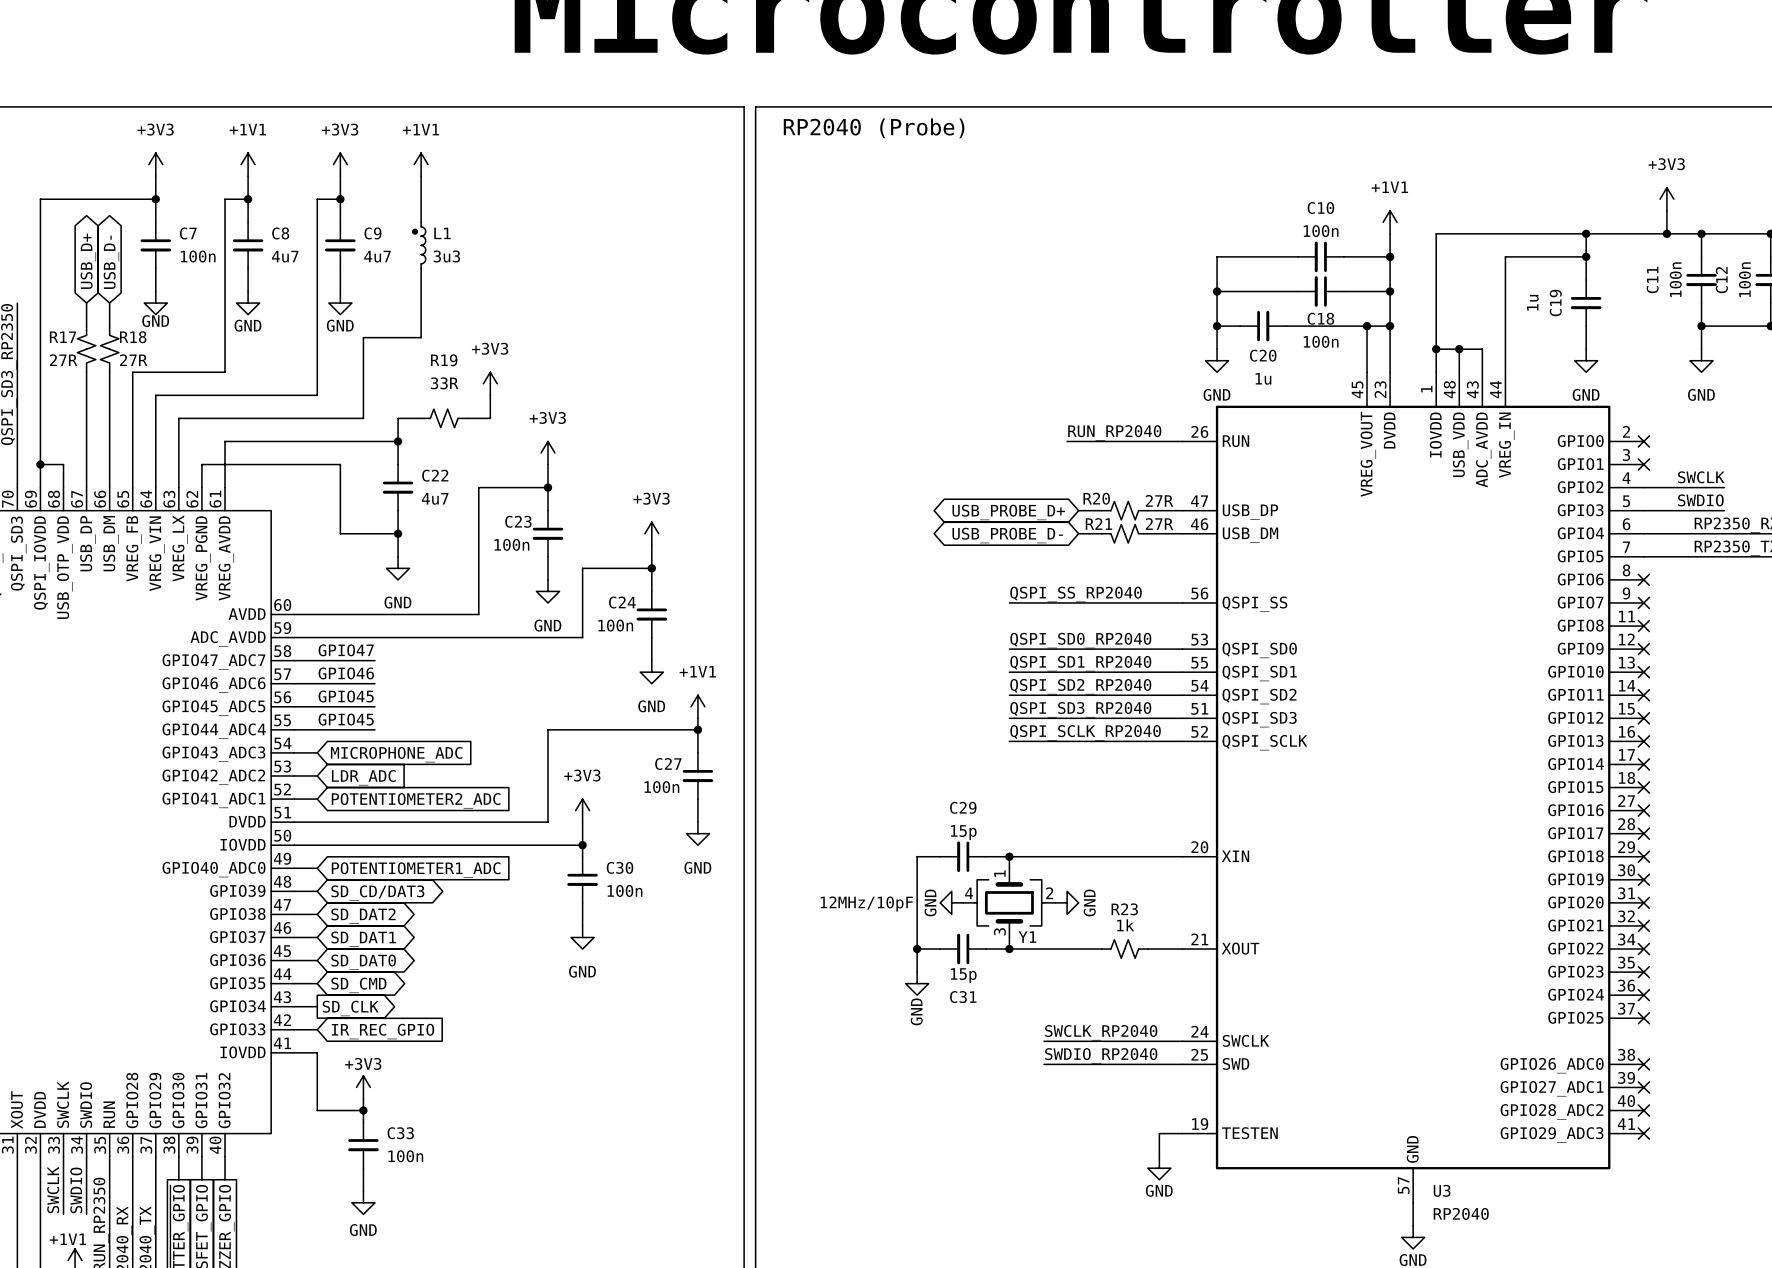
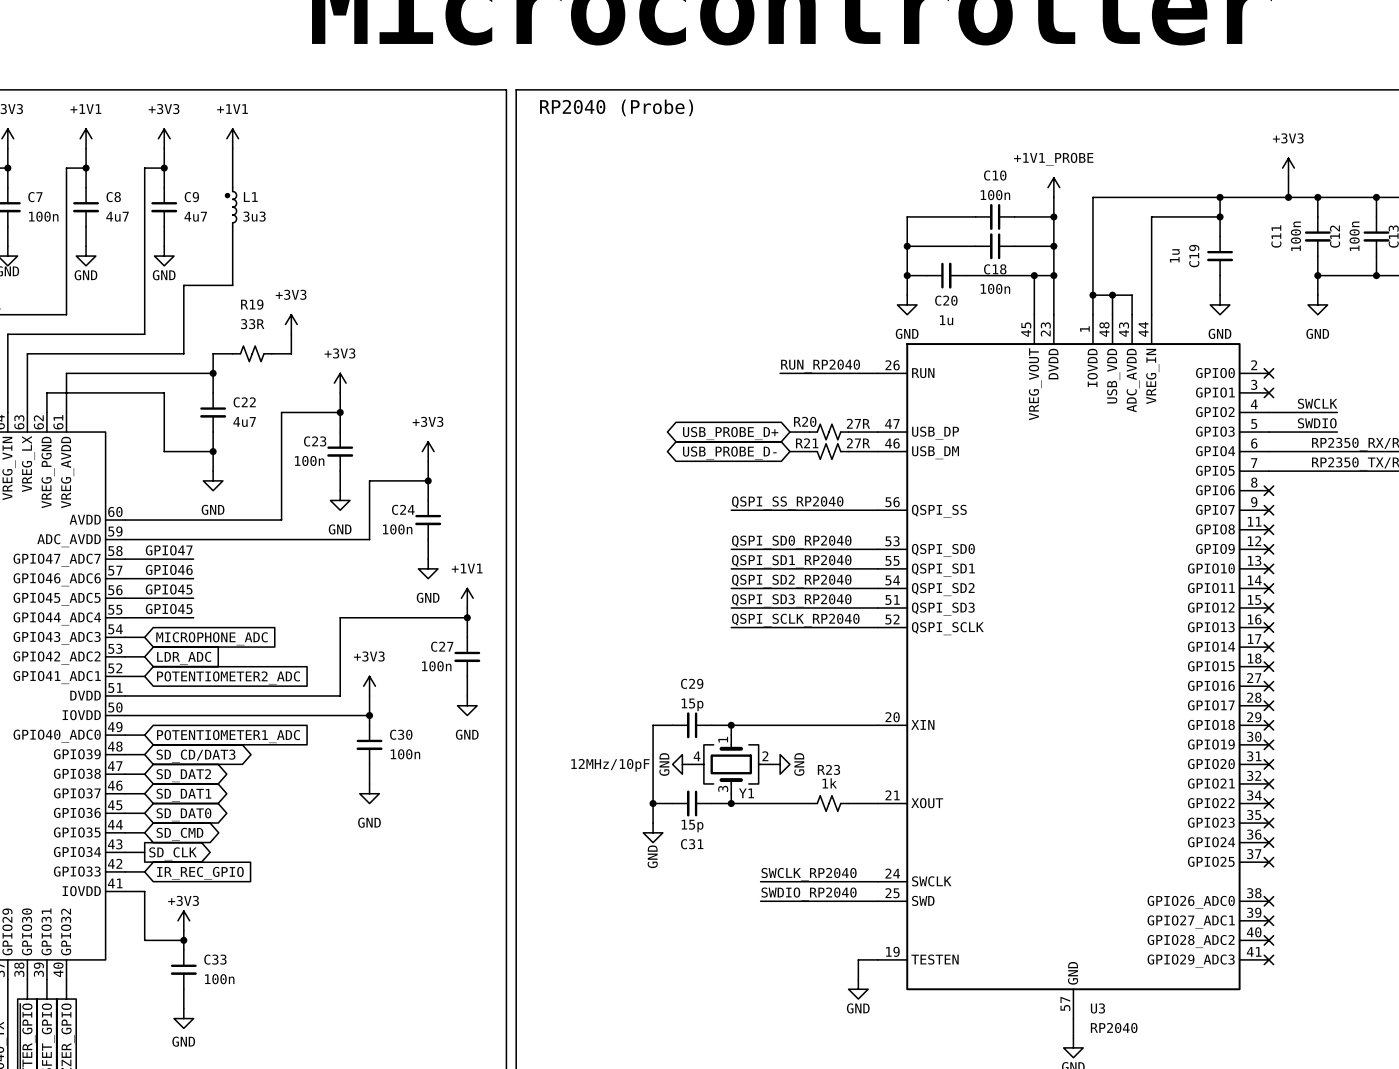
power symbol: +1V1 (1390, 222) -> +1V1_PROBE (1053, 187)

